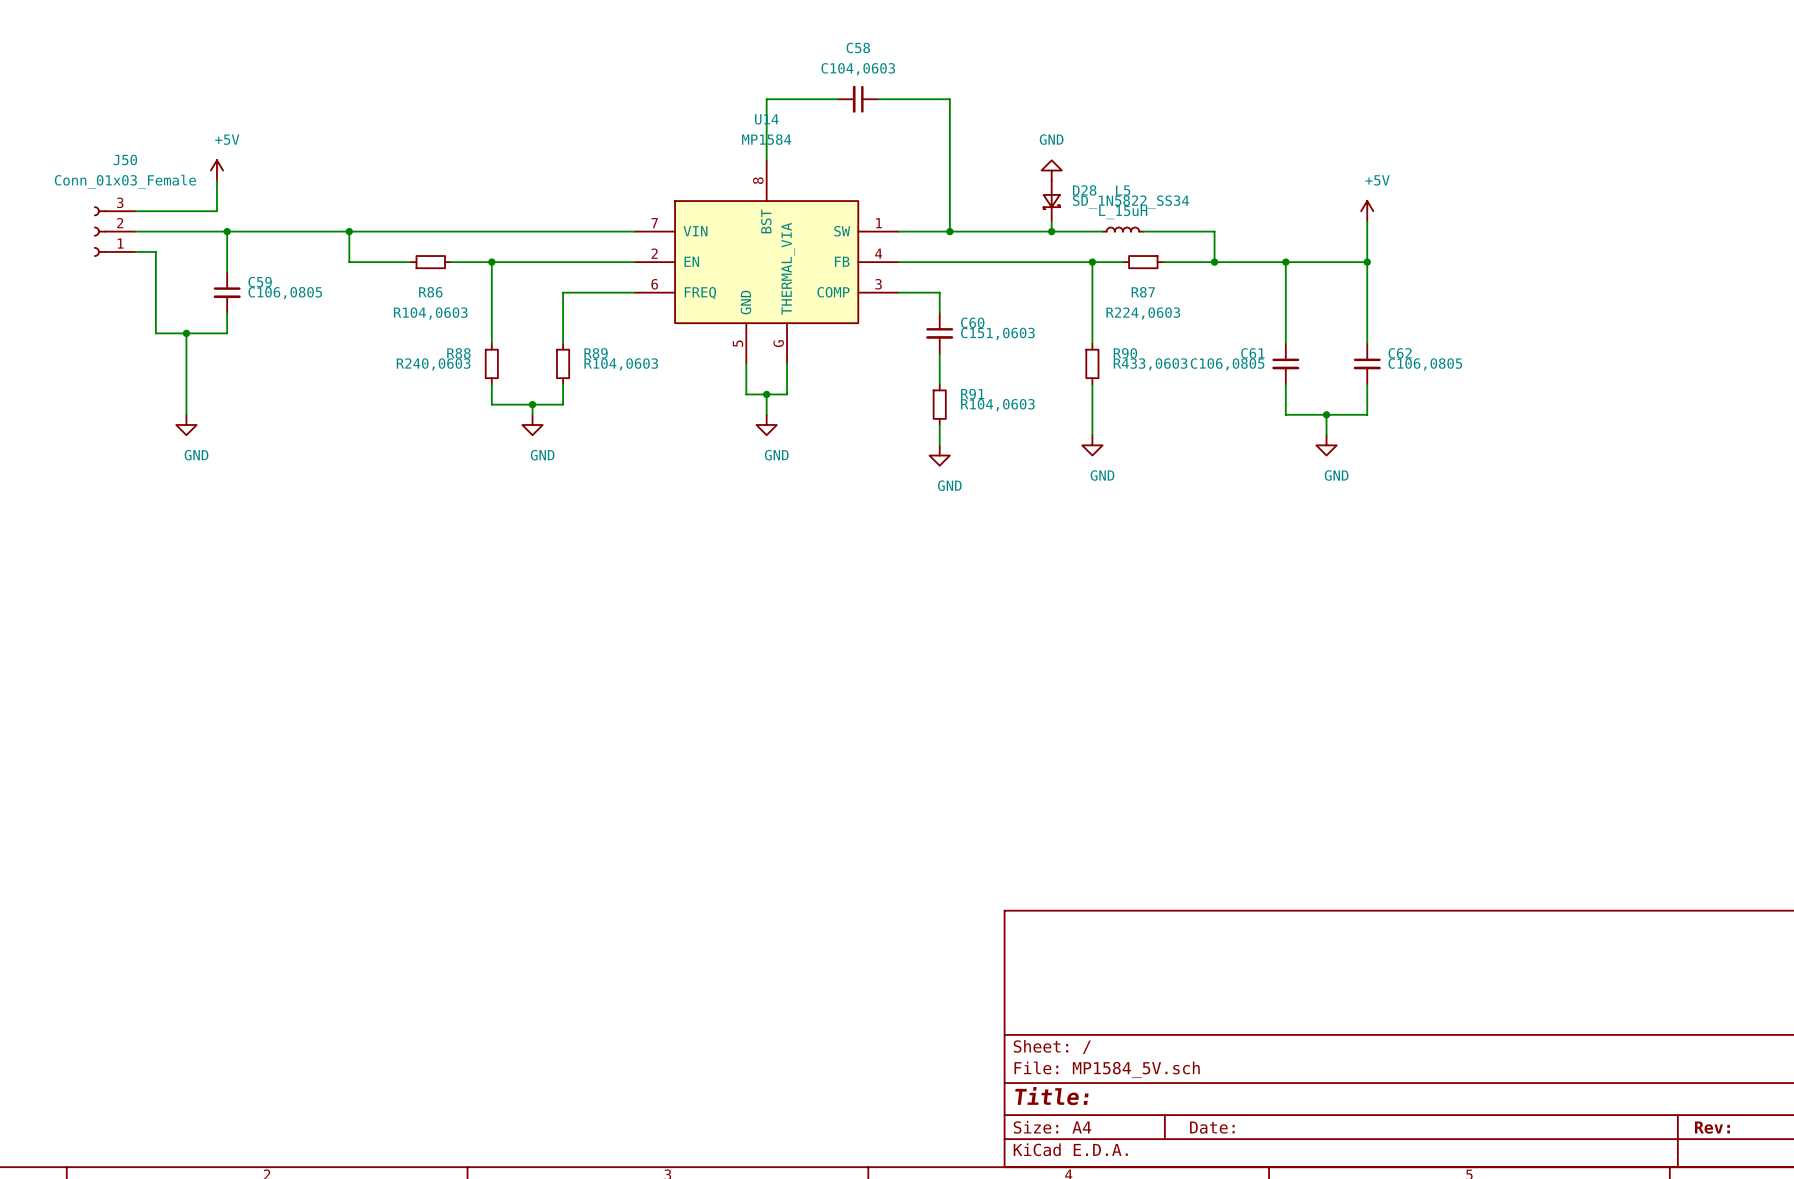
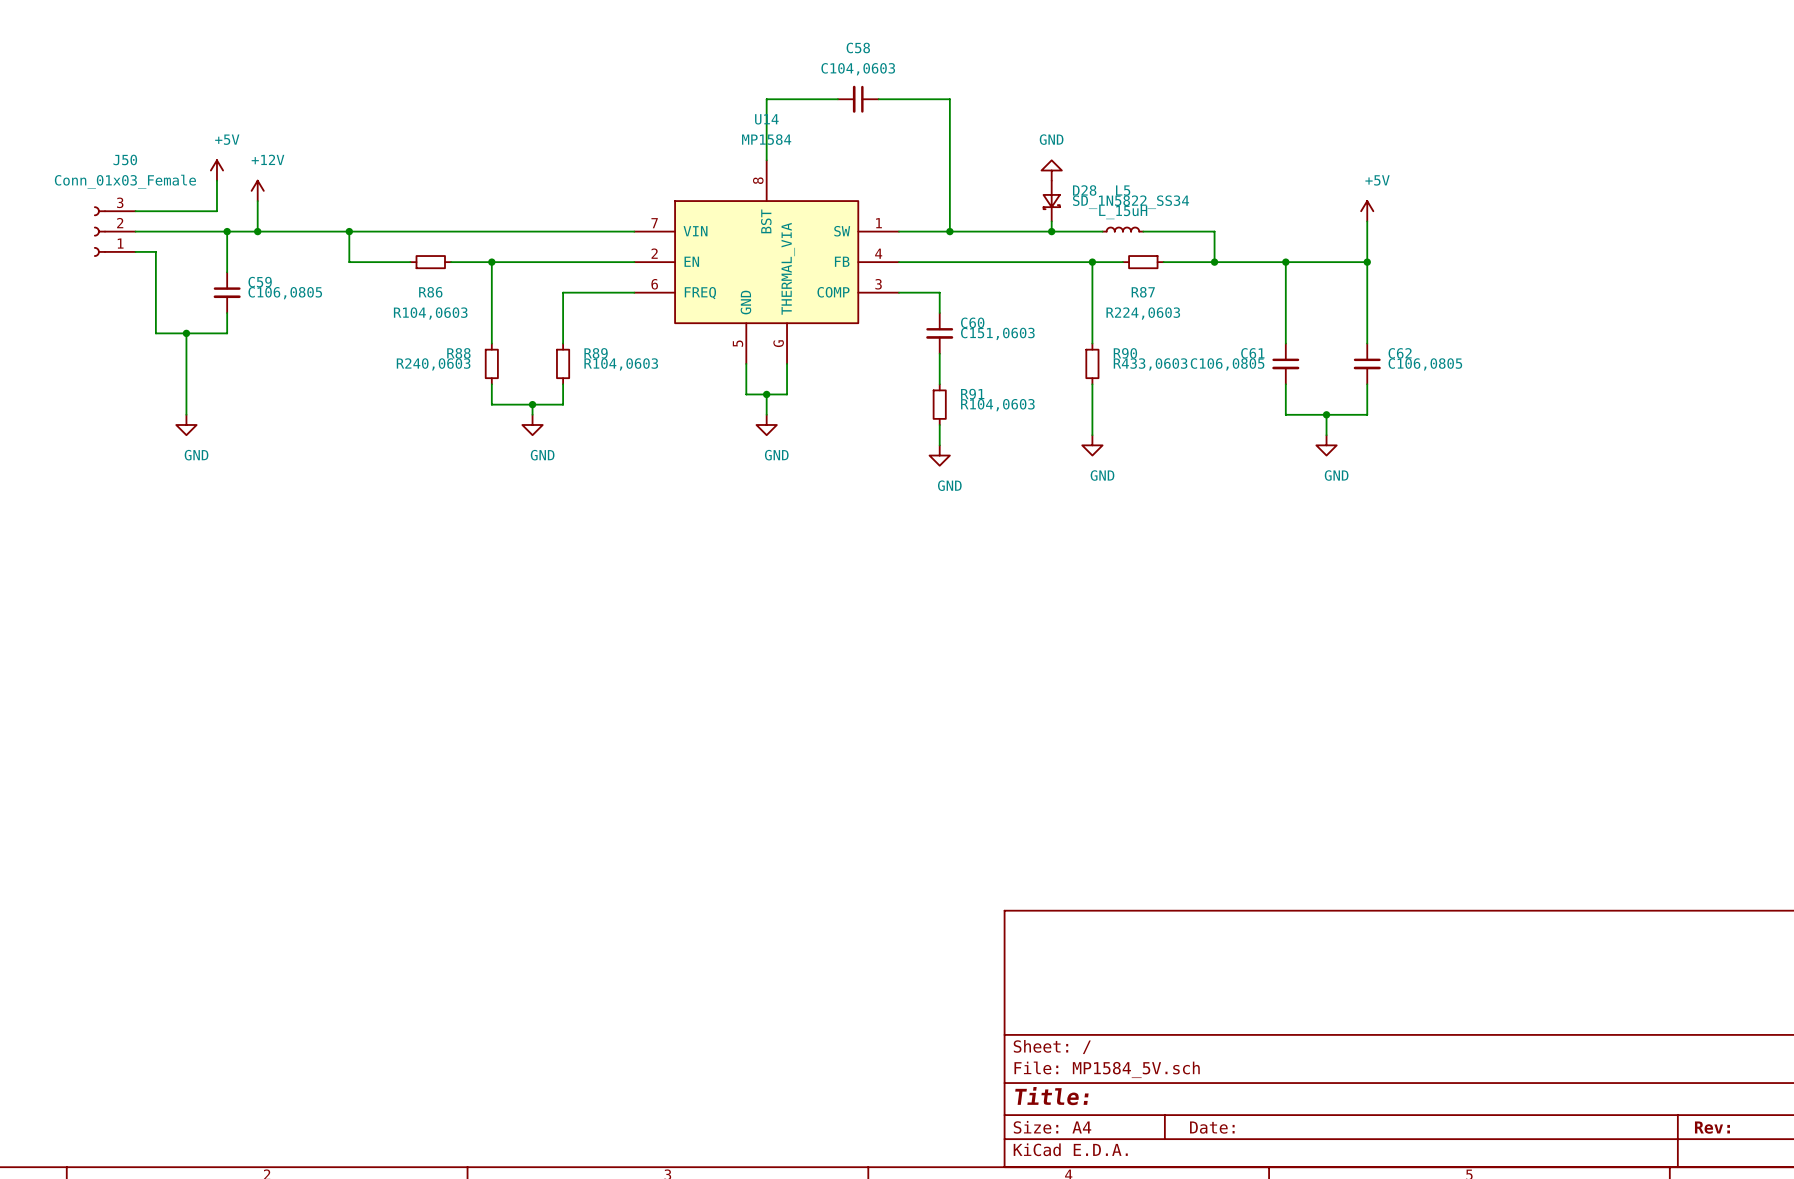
power symbol: none -> +12V (257, 190)
wire: none -> (257, 201) (257, 231)
junction: none -> (257, 231)

